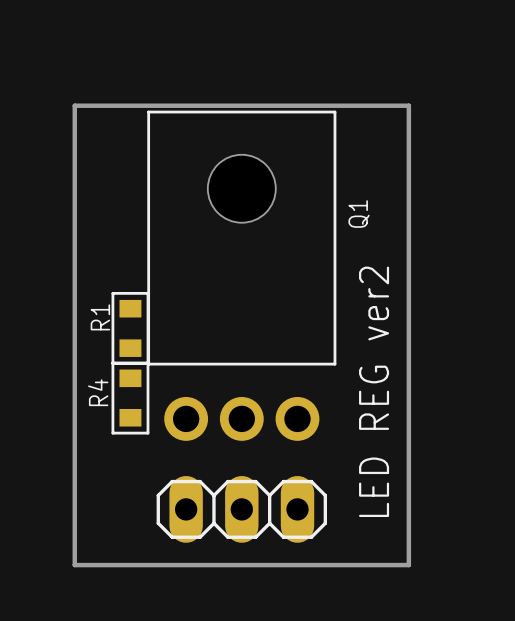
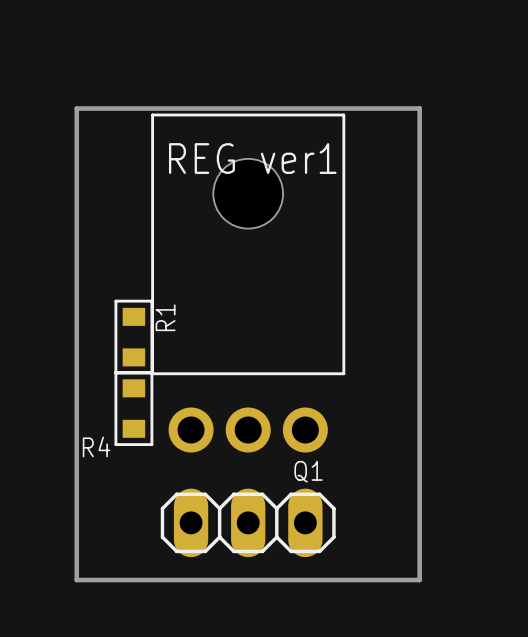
text: none -> REG ver1 (252, 158)
Q1 name rotation: 0° (359, 214) -> 90° clockwise (308, 471)
Q1 name position: Q1 (359, 214) -> Q1 (308, 471)
R1 name position: R1 (100, 317) -> R1 (165, 317)
text: LED REG ver2 (374, 391) -> none
R4 name rotation: 0° (98, 392) -> 90° clockwise (96, 446)
R4 name position: R4 (98, 392) -> R4 (96, 446)

